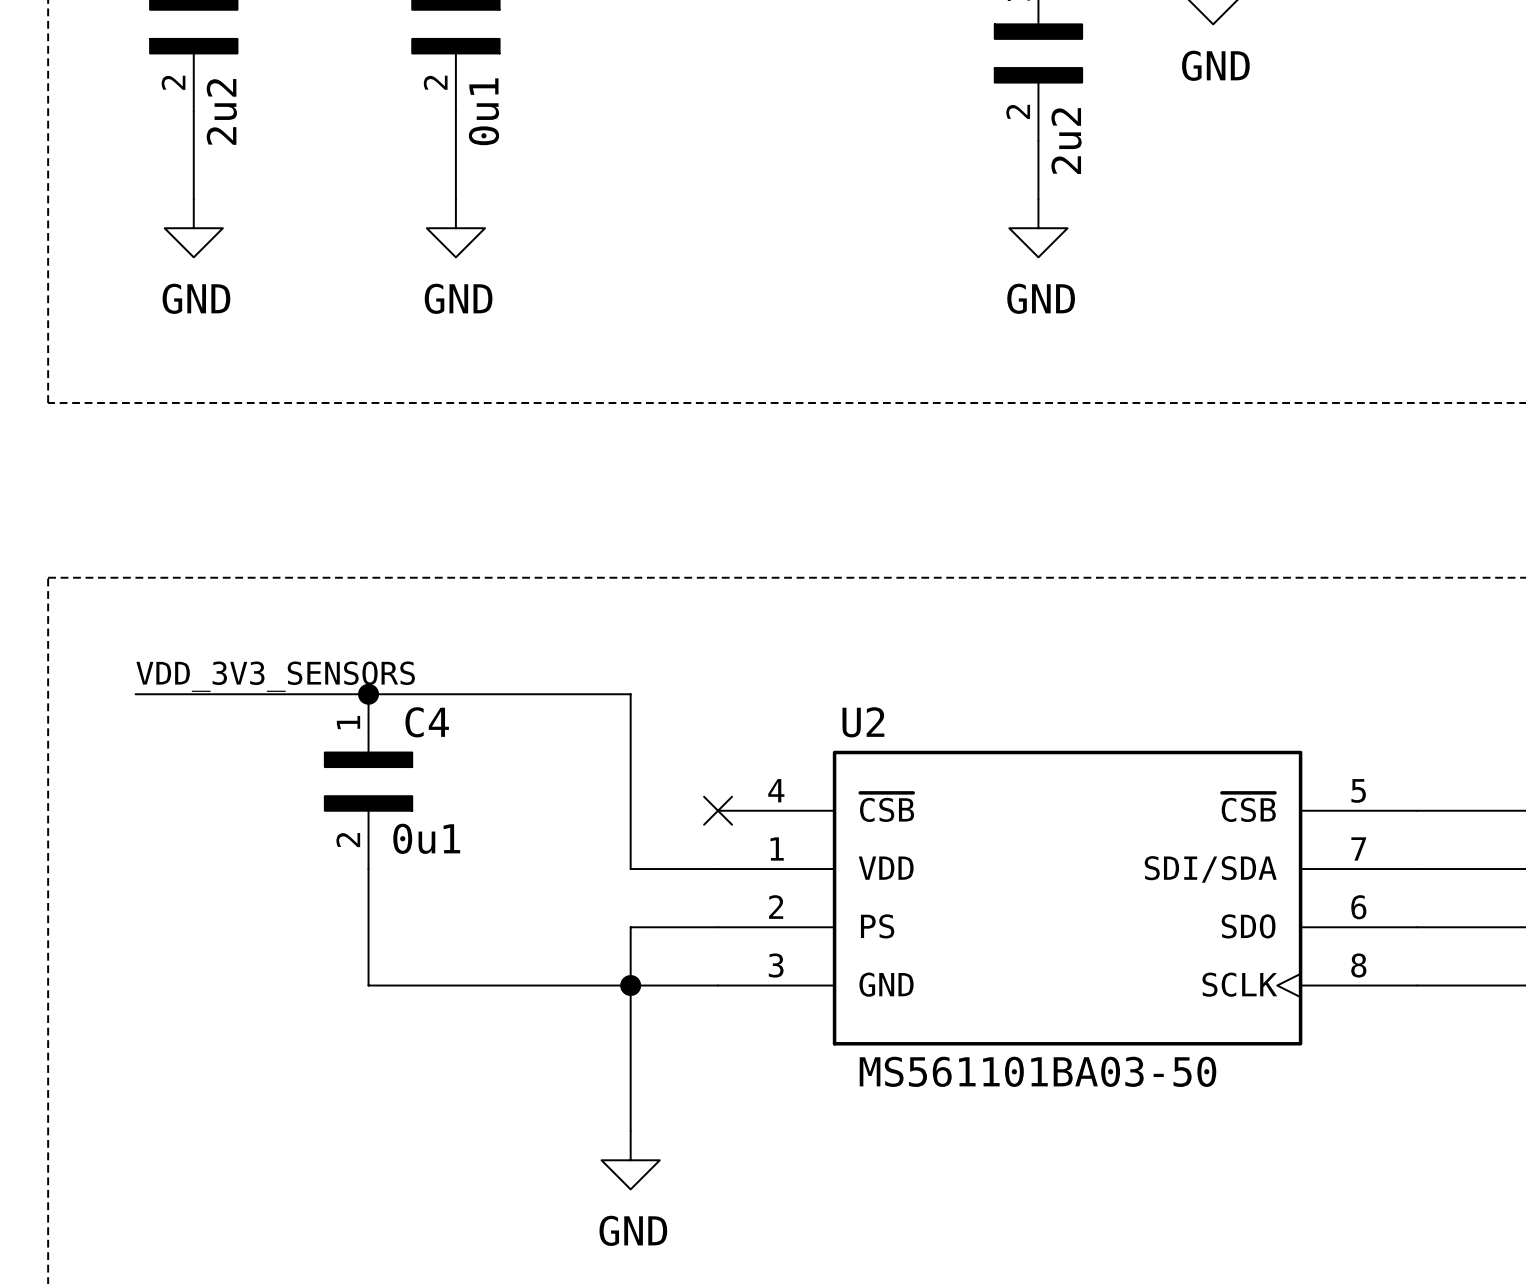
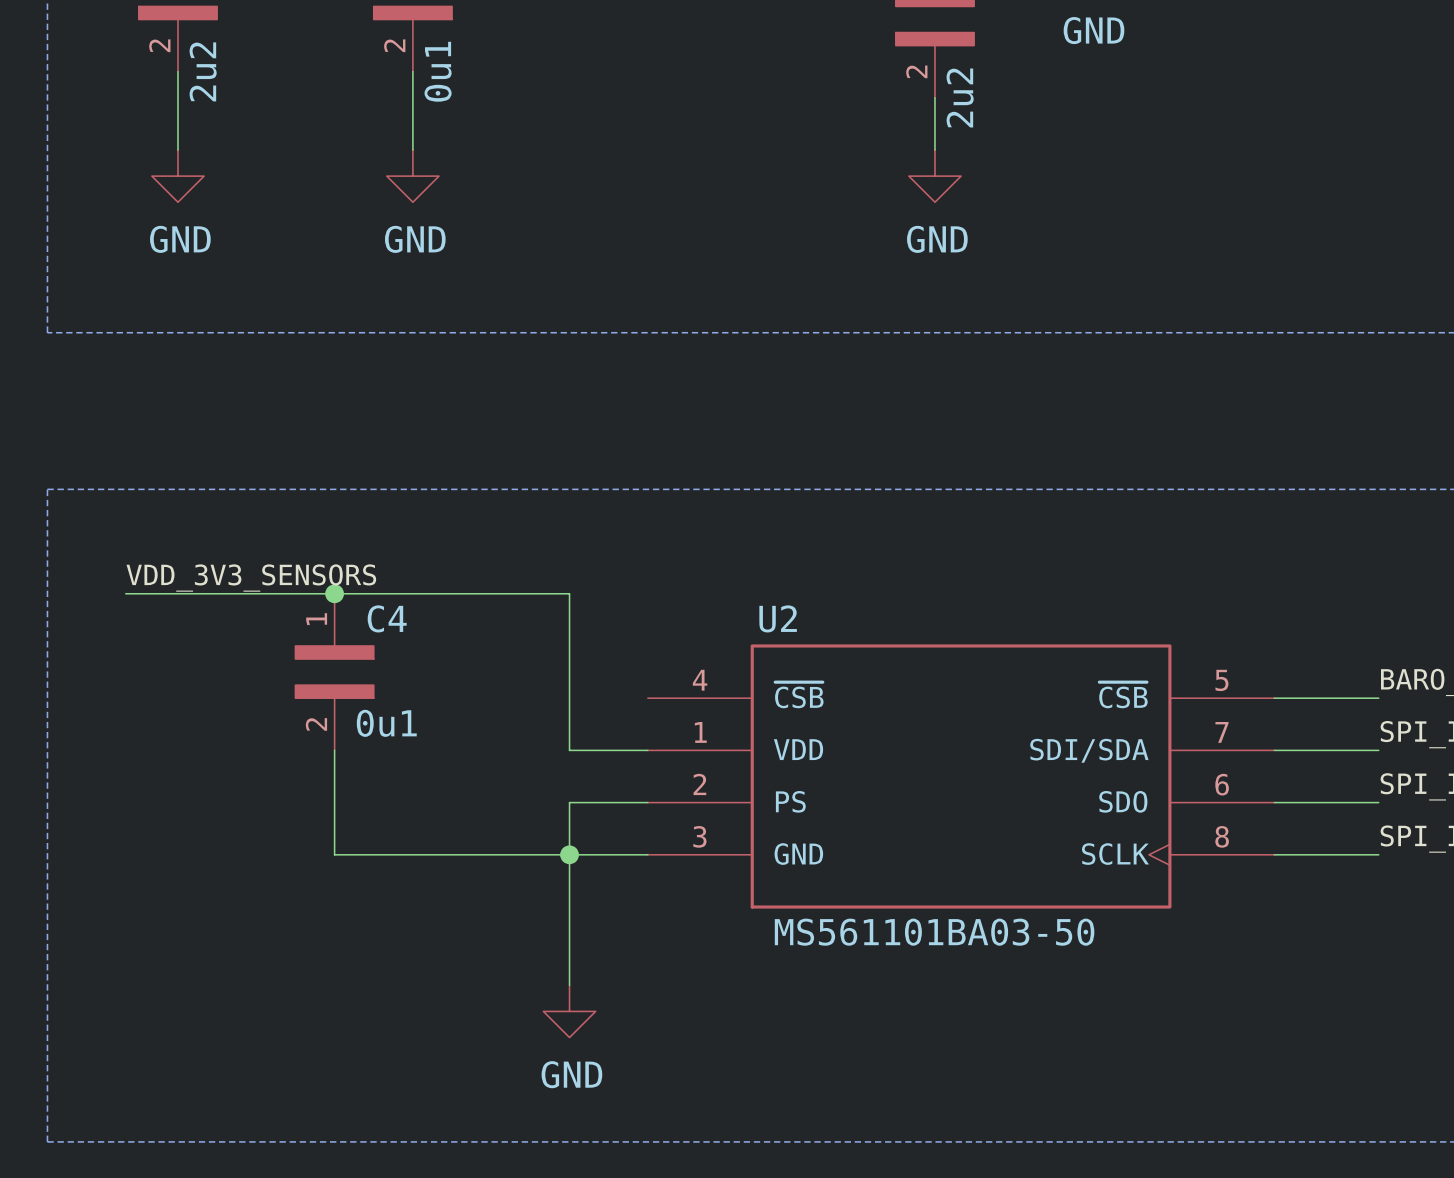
no-connect mark: (718, 810) -> none

